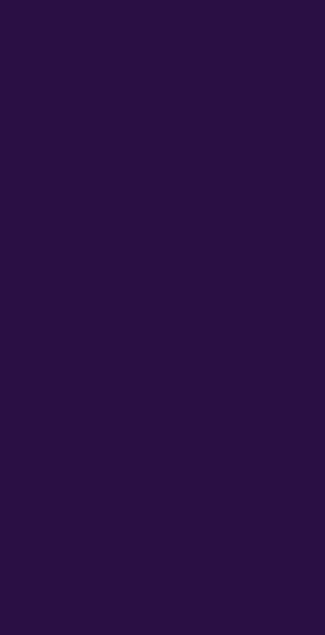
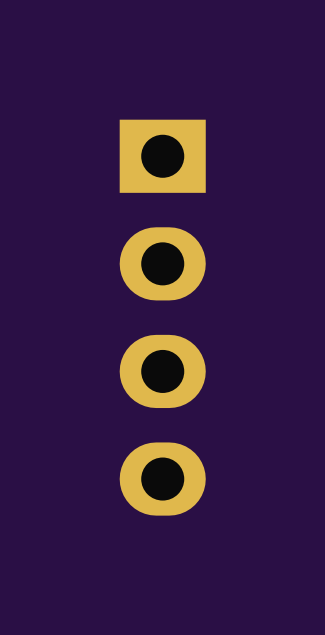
part: none -> (162, 317)

